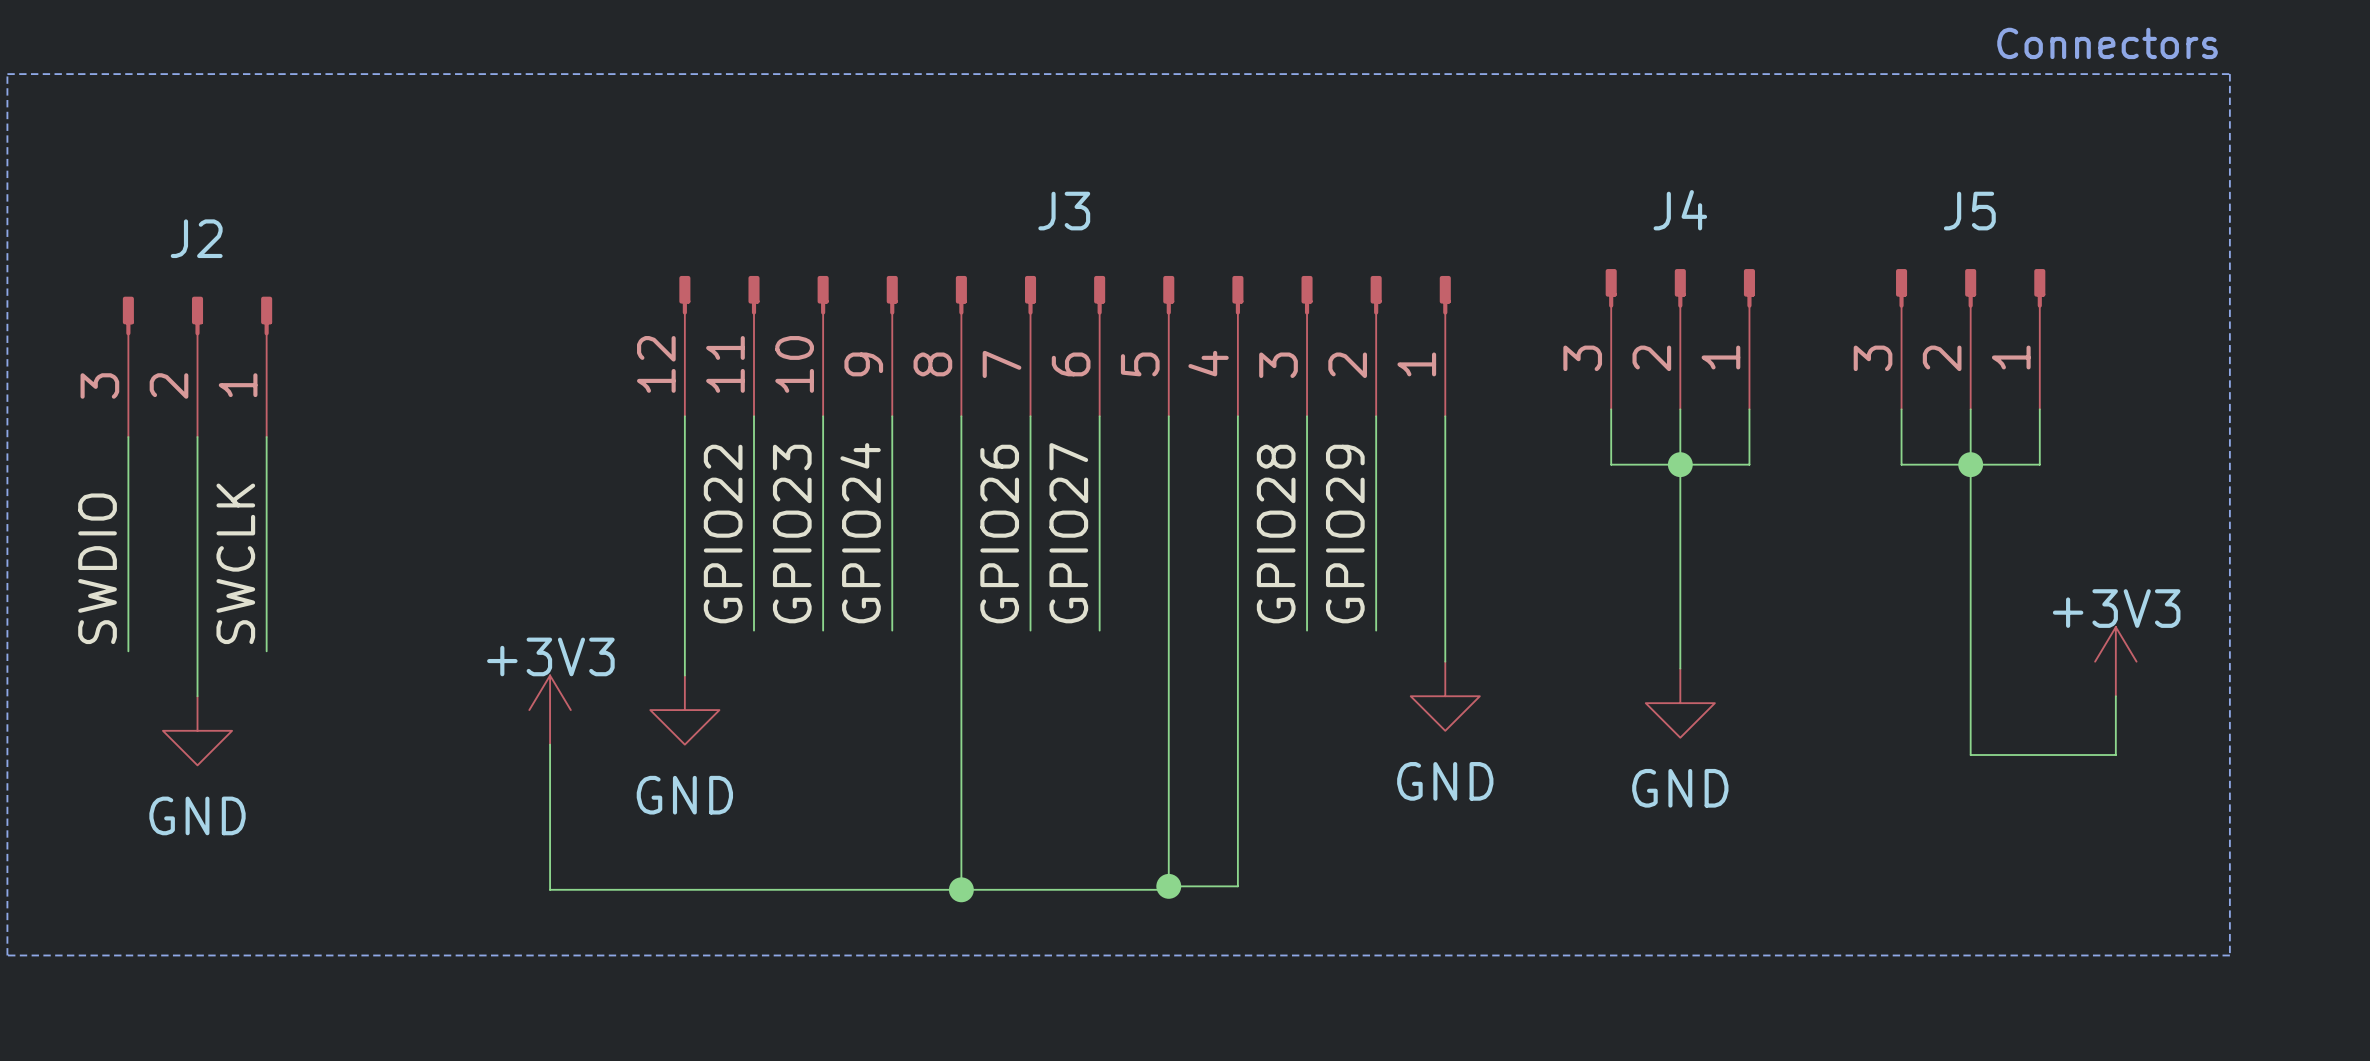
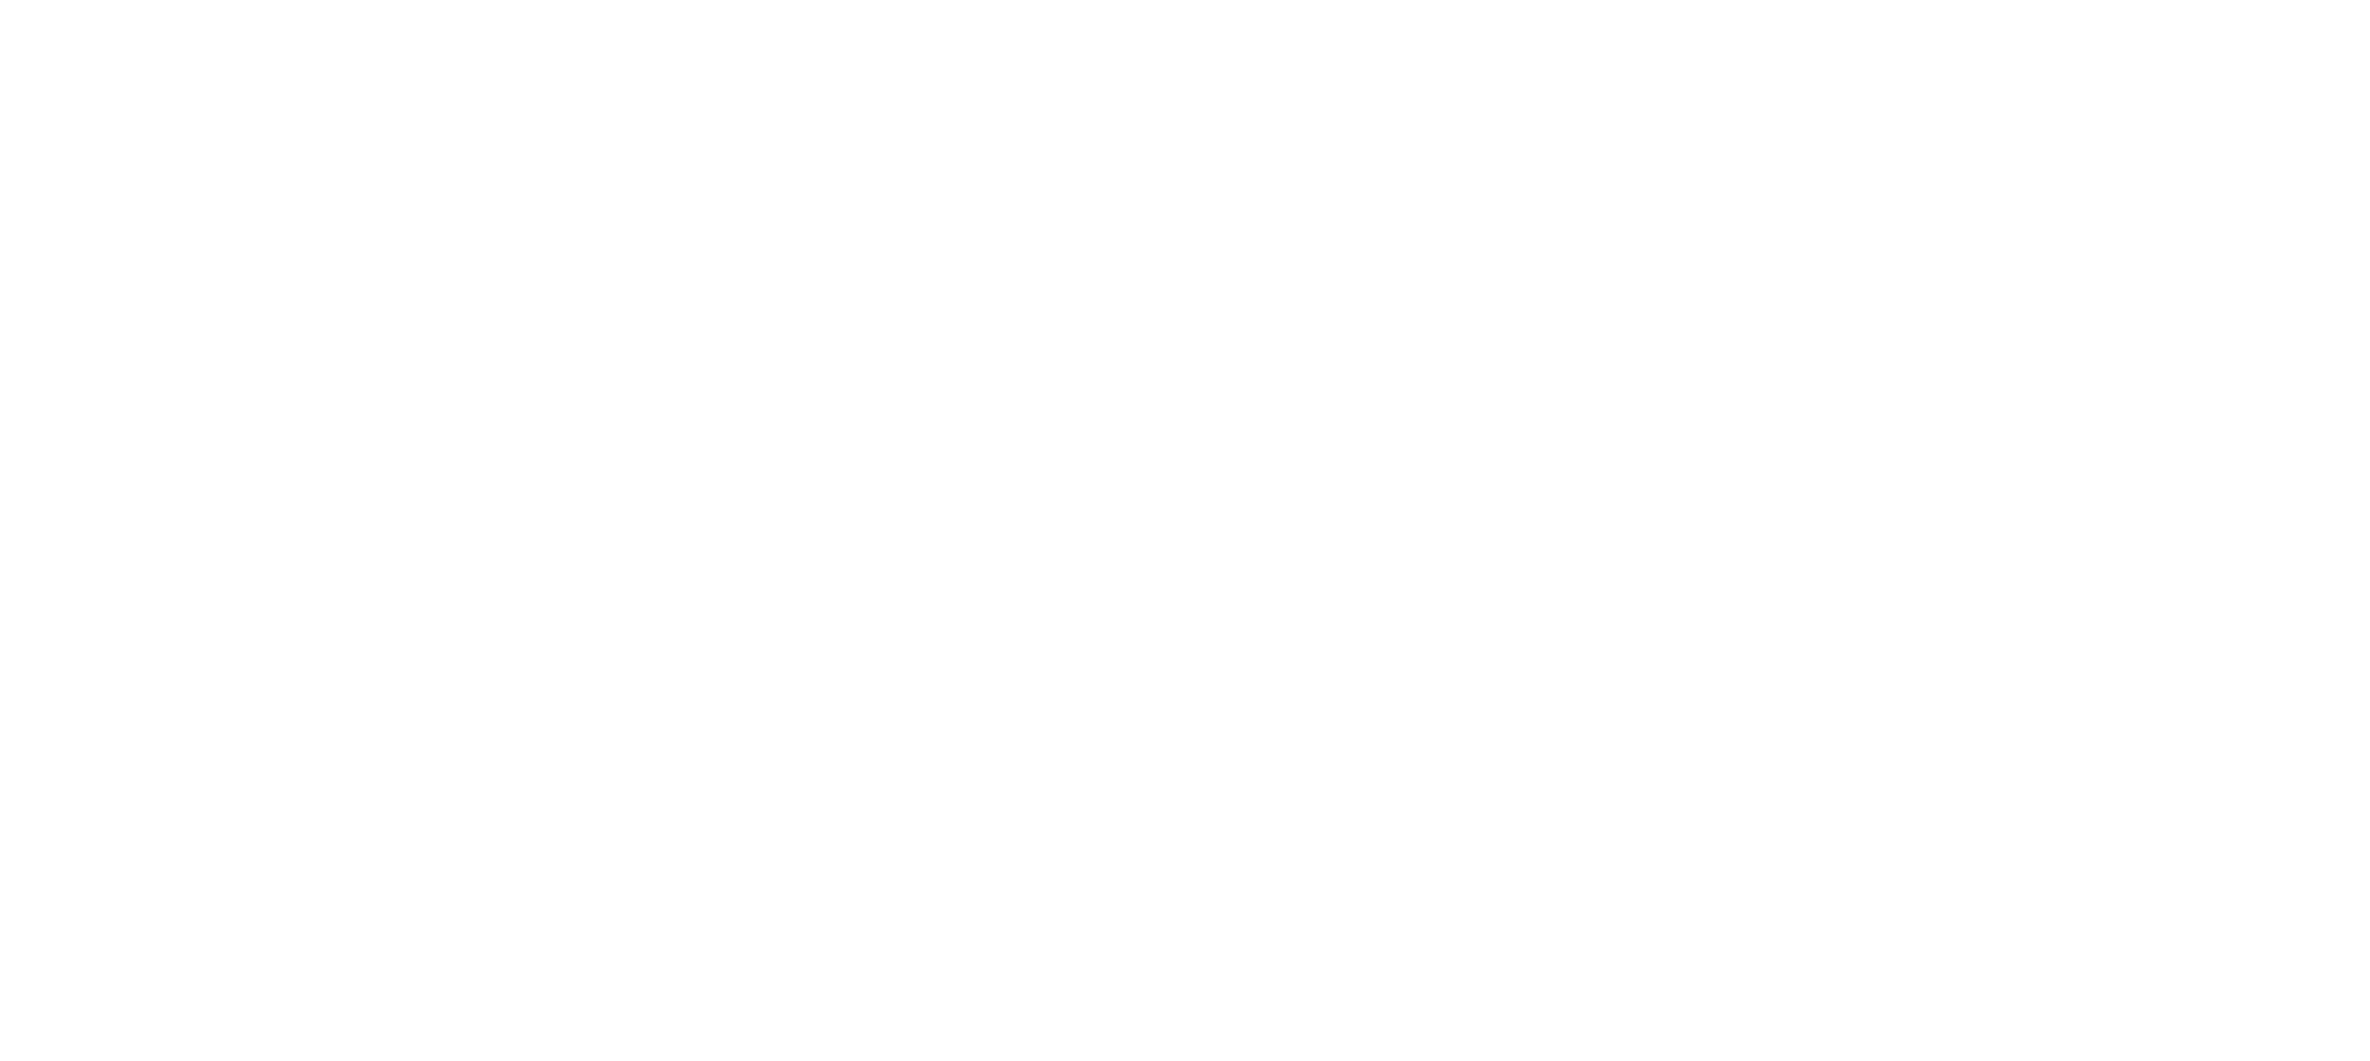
text: Connectors (2107, 43) -> none
line: (7, 74) (2229, 74) (2229, 955) (7, 955) (7, 74) -> none
J4: (1680, 339) -> none
J5: (1970, 339) -> none
J3: (1065, 346) -> none
J2: (197, 366) -> none
wire: (1611, 409) (1611, 464) (1749, 464) (1749, 409) -> none
wire: (1680, 409) (1680, 668) -> none
wire: (1901, 409) (1901, 464) (2039, 464) (2039, 409) -> none
wire: (1970, 409) (1970, 755) (2115, 755) (2115, 696) -> none
wire: (684, 416) (684, 675) -> none
wire: (754, 416) (754, 630) -> none
wire: (823, 416) (823, 630) -> none
wire: (892, 416) (892, 630) -> none
wire: (961, 416) (961, 889) -> none
wire: (1030, 416) (1030, 630) -> none
wire: (1099, 416) (1099, 630) -> none
wire: (1168, 416) (1168, 889) (550, 889) (550, 744) -> none
wire: (1237, 416) (1237, 886) (1168, 886) -> none
wire: (1307, 416) (1307, 630) -> none
wire: (1376, 416) (1376, 630) -> none
wire: (1445, 416) (1445, 661) -> none
wire: (128, 437) (128, 651) -> none
wire: (197, 437) (197, 696) -> none
wire: (266, 437) (266, 651) -> none
junction: (1680, 464) -> none
junction: (1970, 464) -> none
label: GPIO24 (860, 533) -> none
label: GPIO27 (1068, 533) -> none
label: GPIO22 (723, 534) -> none
label: GPIO23 (792, 534) -> none
label: GPIO26 (999, 534) -> none
label: GPIO28 (1276, 534) -> none
label: GPIO29 (1345, 534) -> none
label: SWCLK (235, 563) -> none
label: SWDIO (97, 568) -> none
power symbol: +3V3 (2115, 661) -> none
power symbol: GND (1445, 696) -> none
power symbol: GND (1680, 703) -> none
power symbol: +3V3 (550, 710) -> none
power symbol: GND (684, 710) -> none
power symbol: GND (197, 730) -> none
junction: (1168, 886) -> none
junction: (961, 889) -> none

